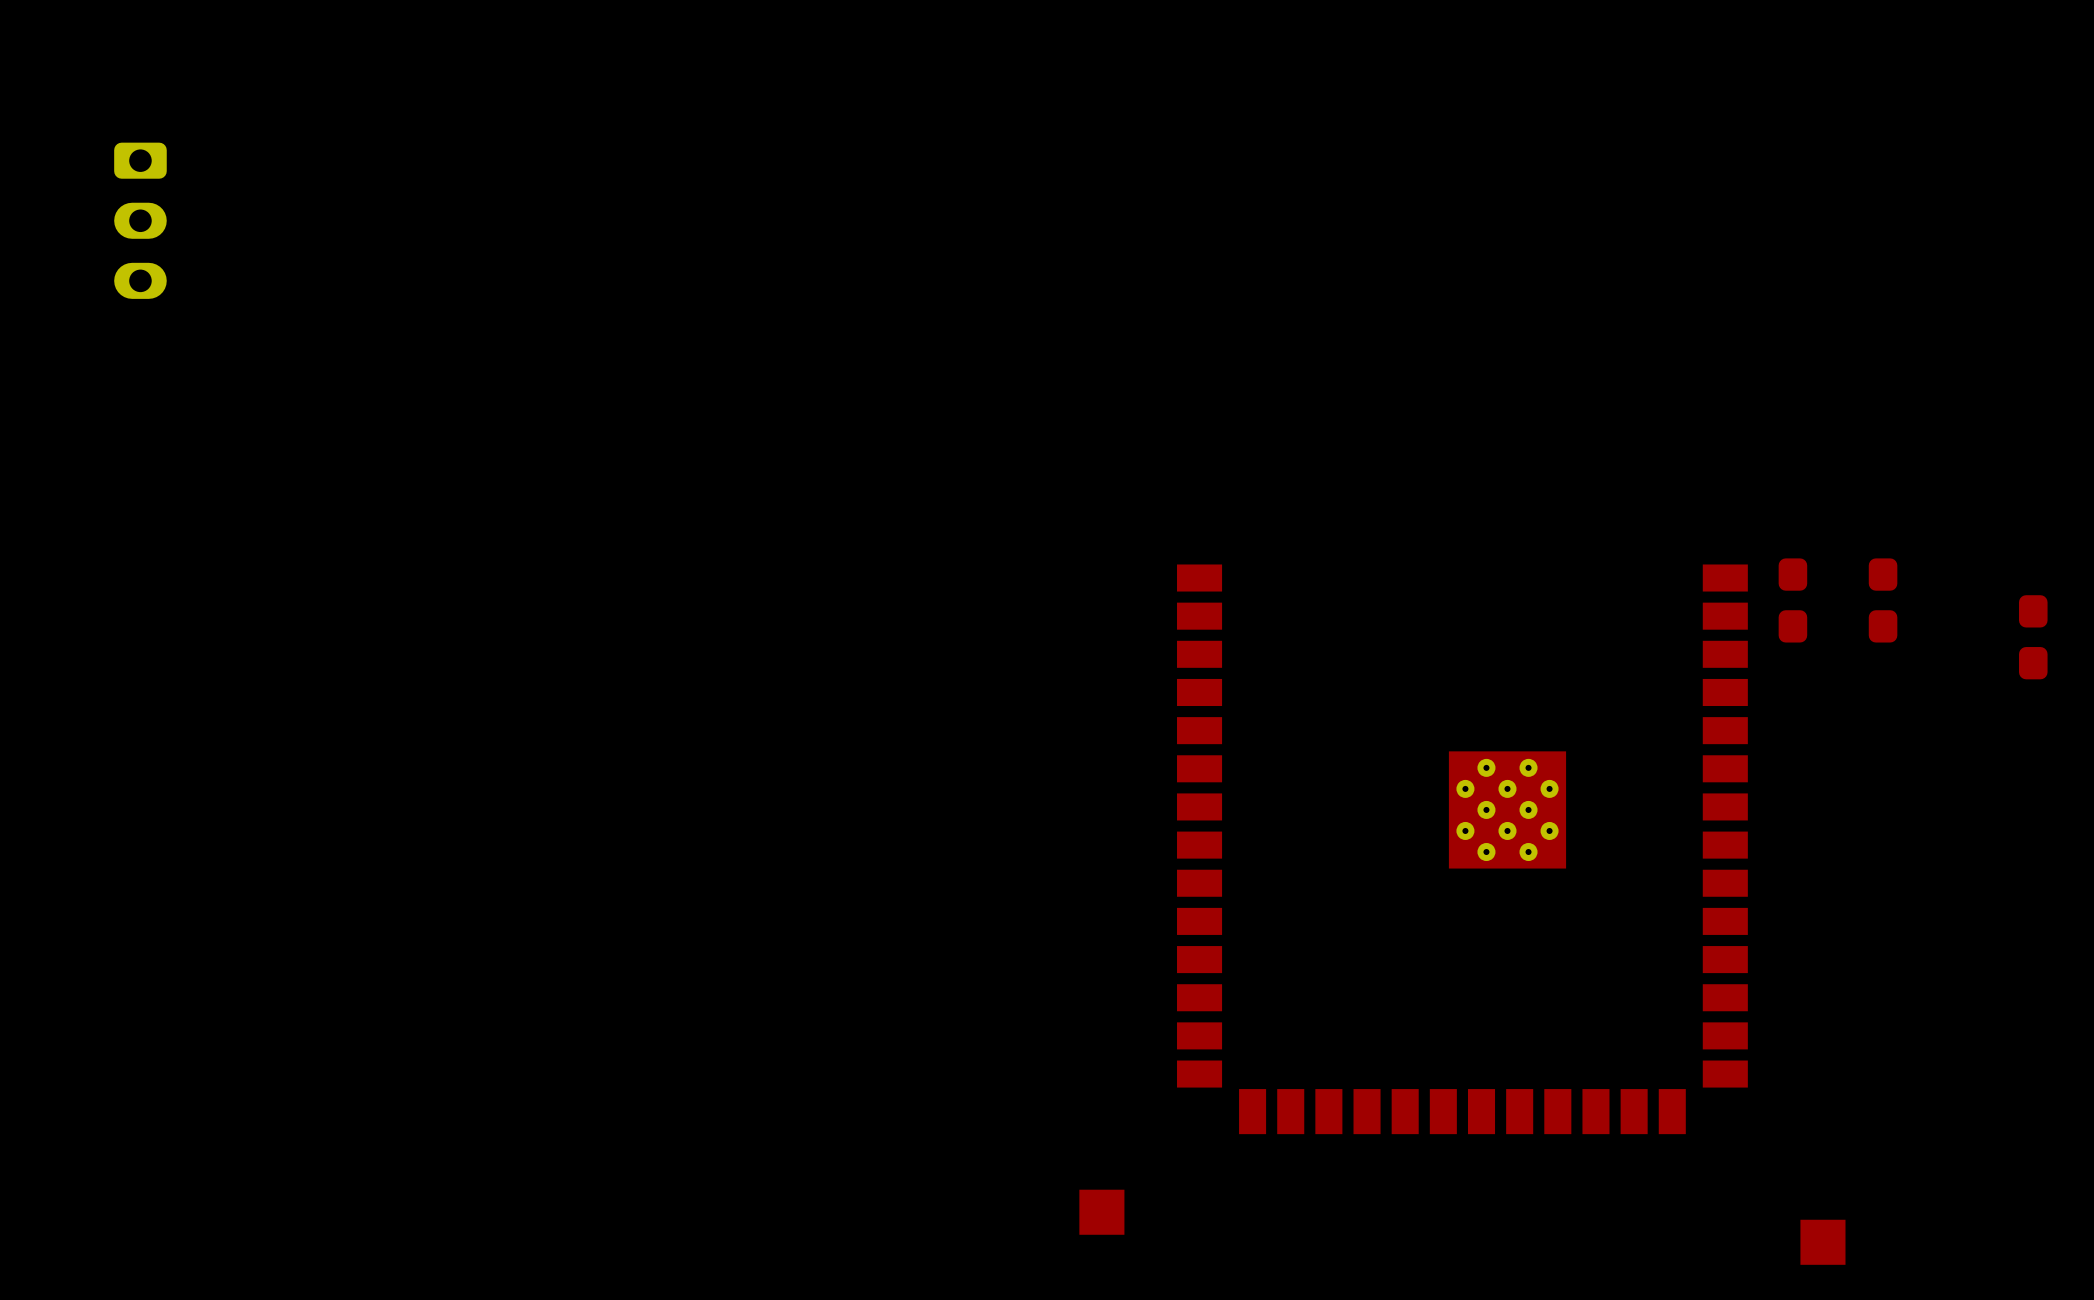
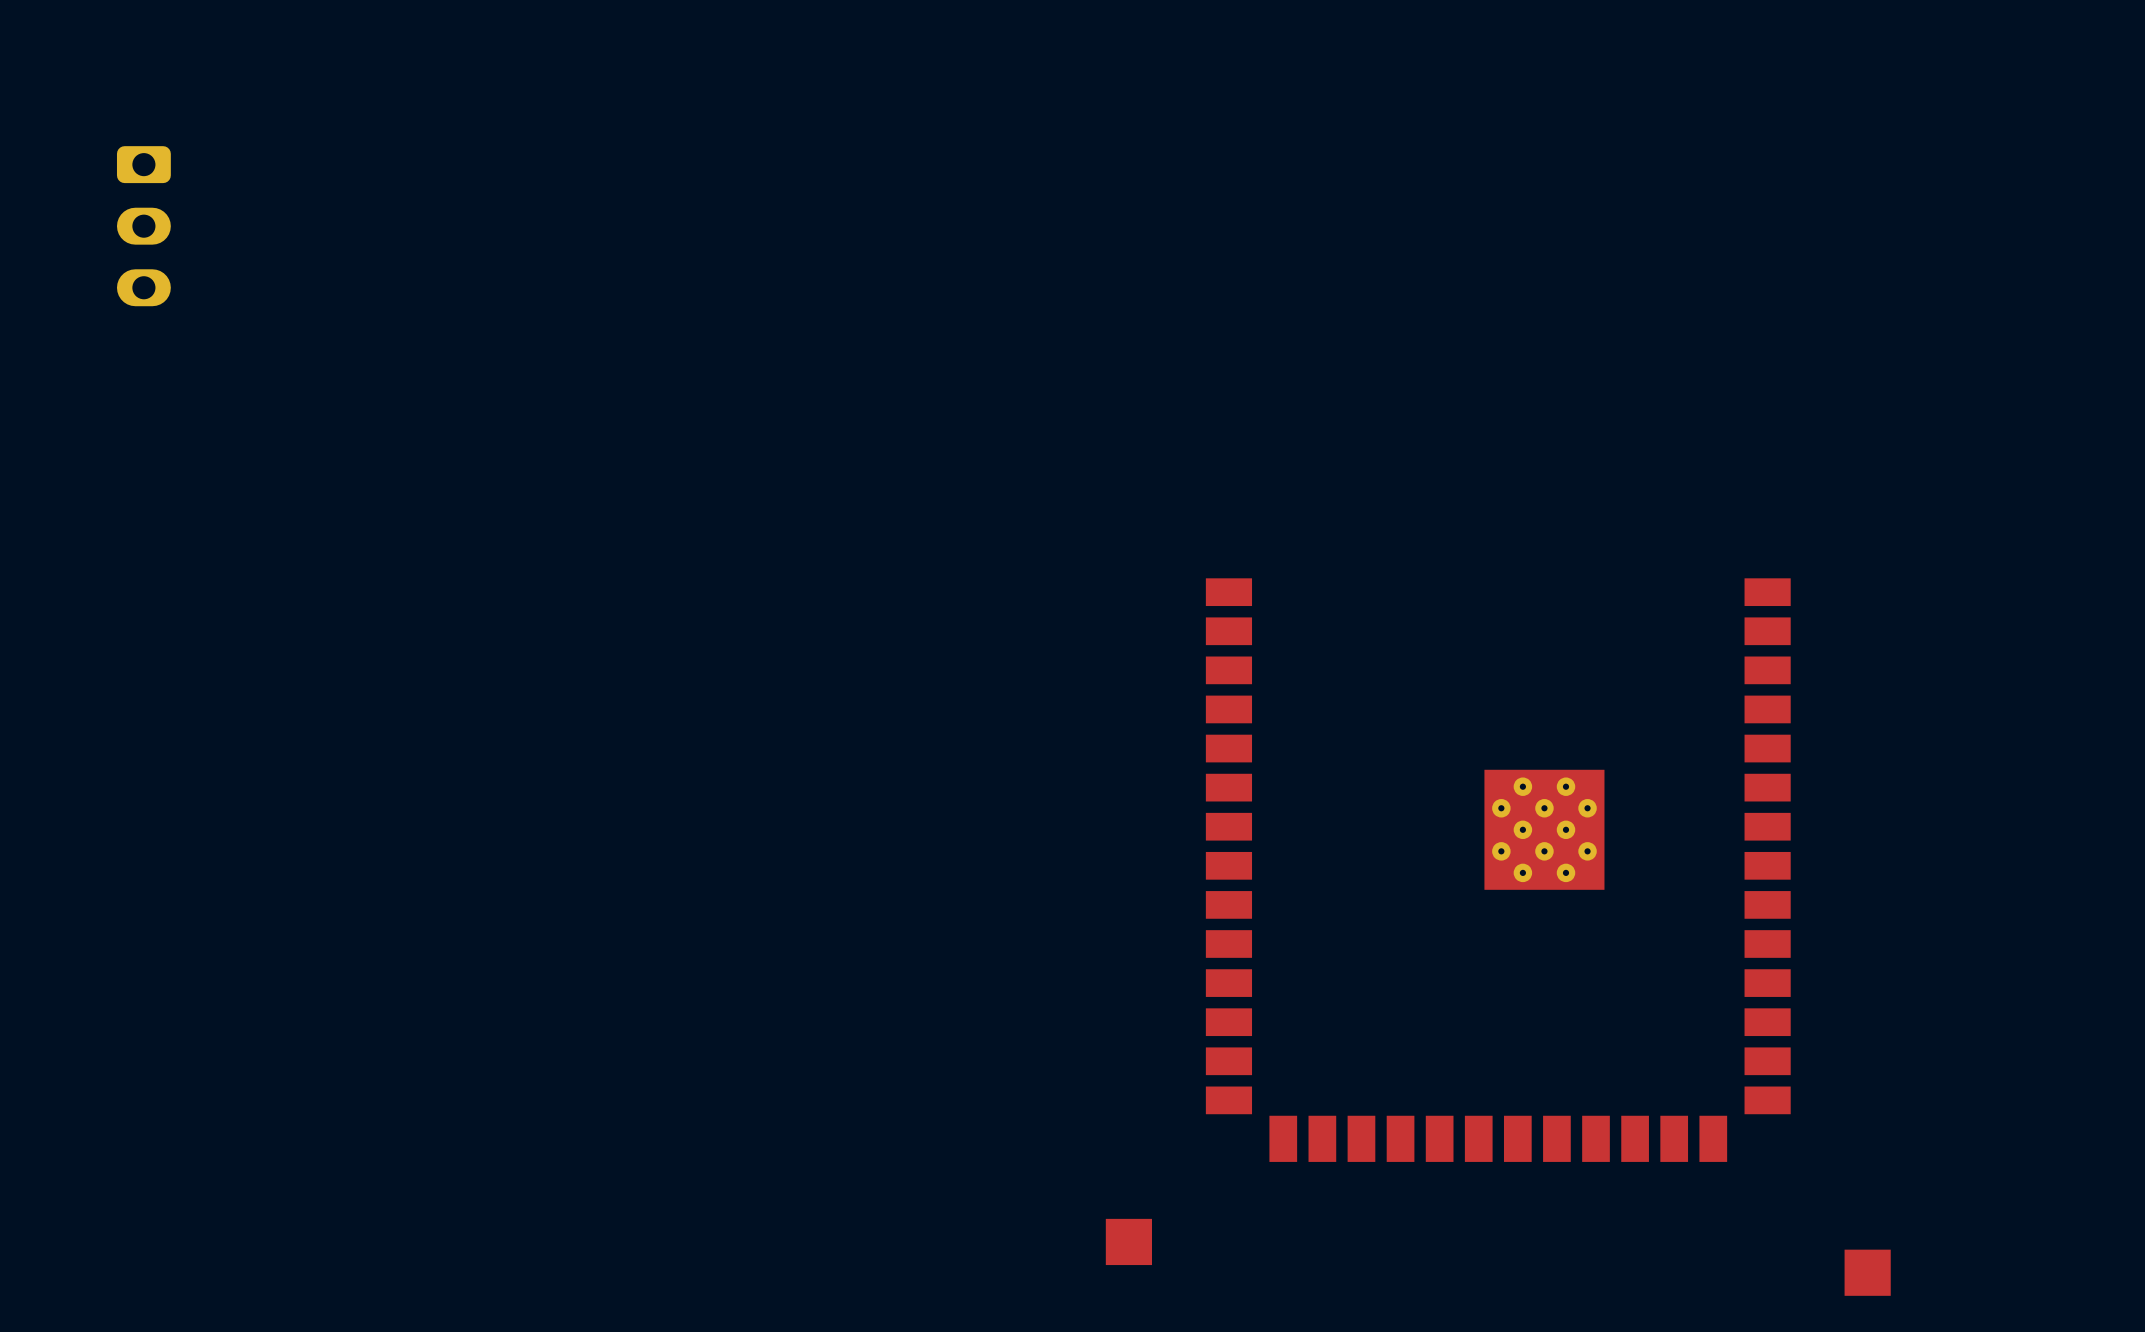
part: (1792, 600) -> none
part: (1883, 600) -> none
part: (2033, 637) -> none

